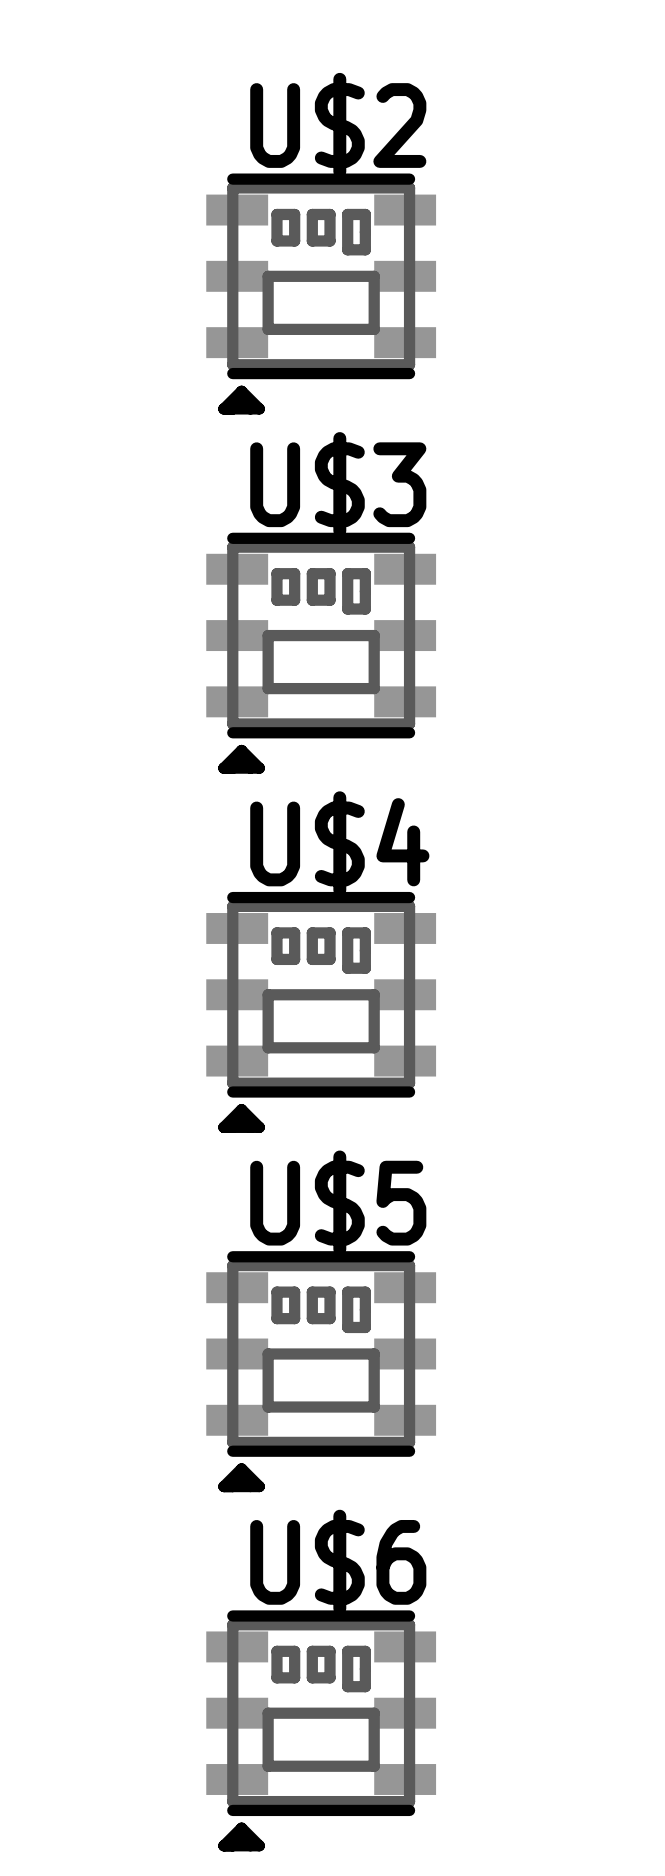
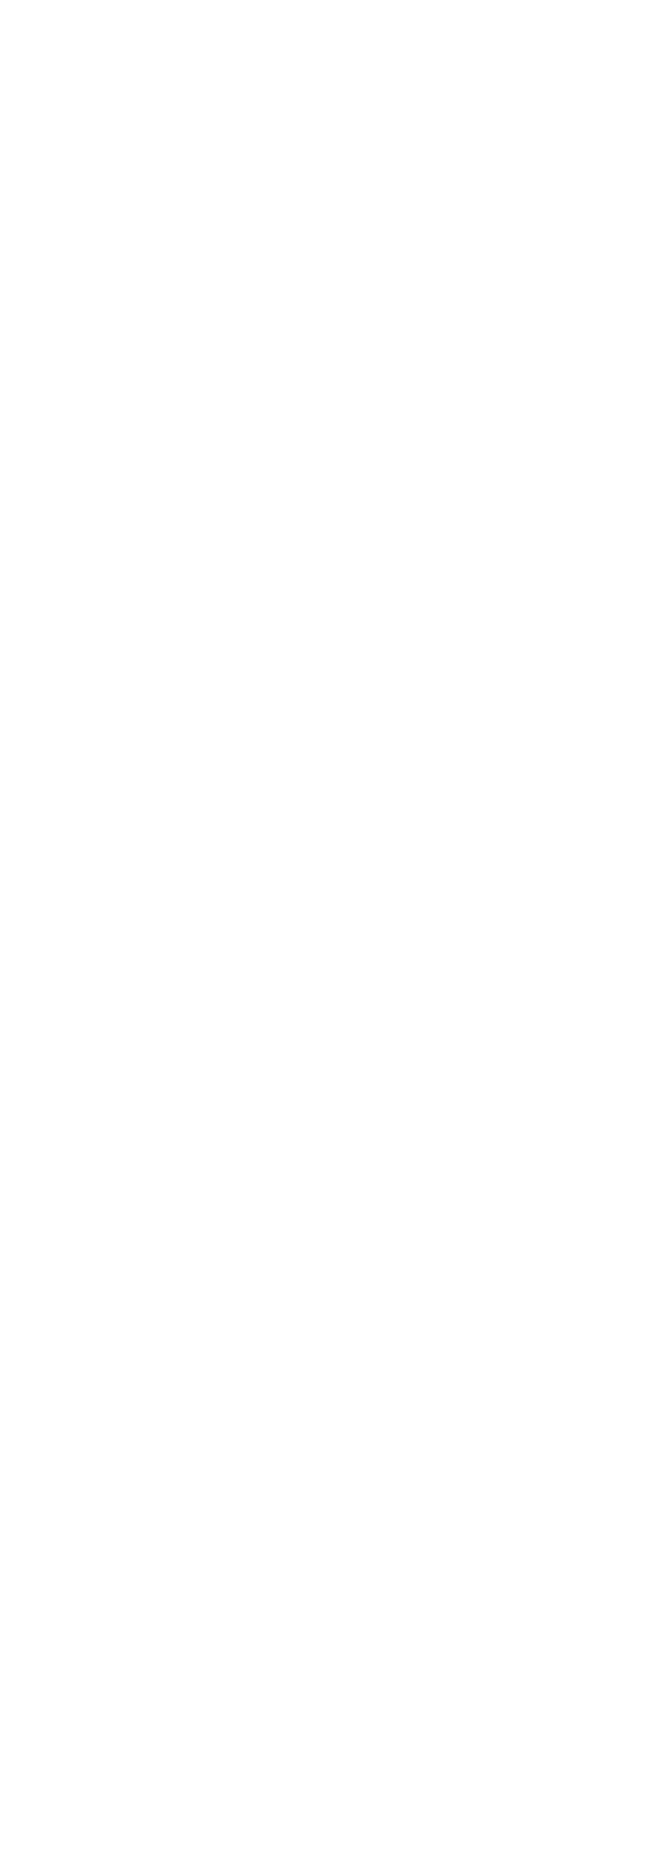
U$2: (321, 294) -> none
U$3: (321, 653) -> none
U$4: (321, 1012) -> none
U$5: (321, 1371) -> none
U$6: (321, 1730) -> none

